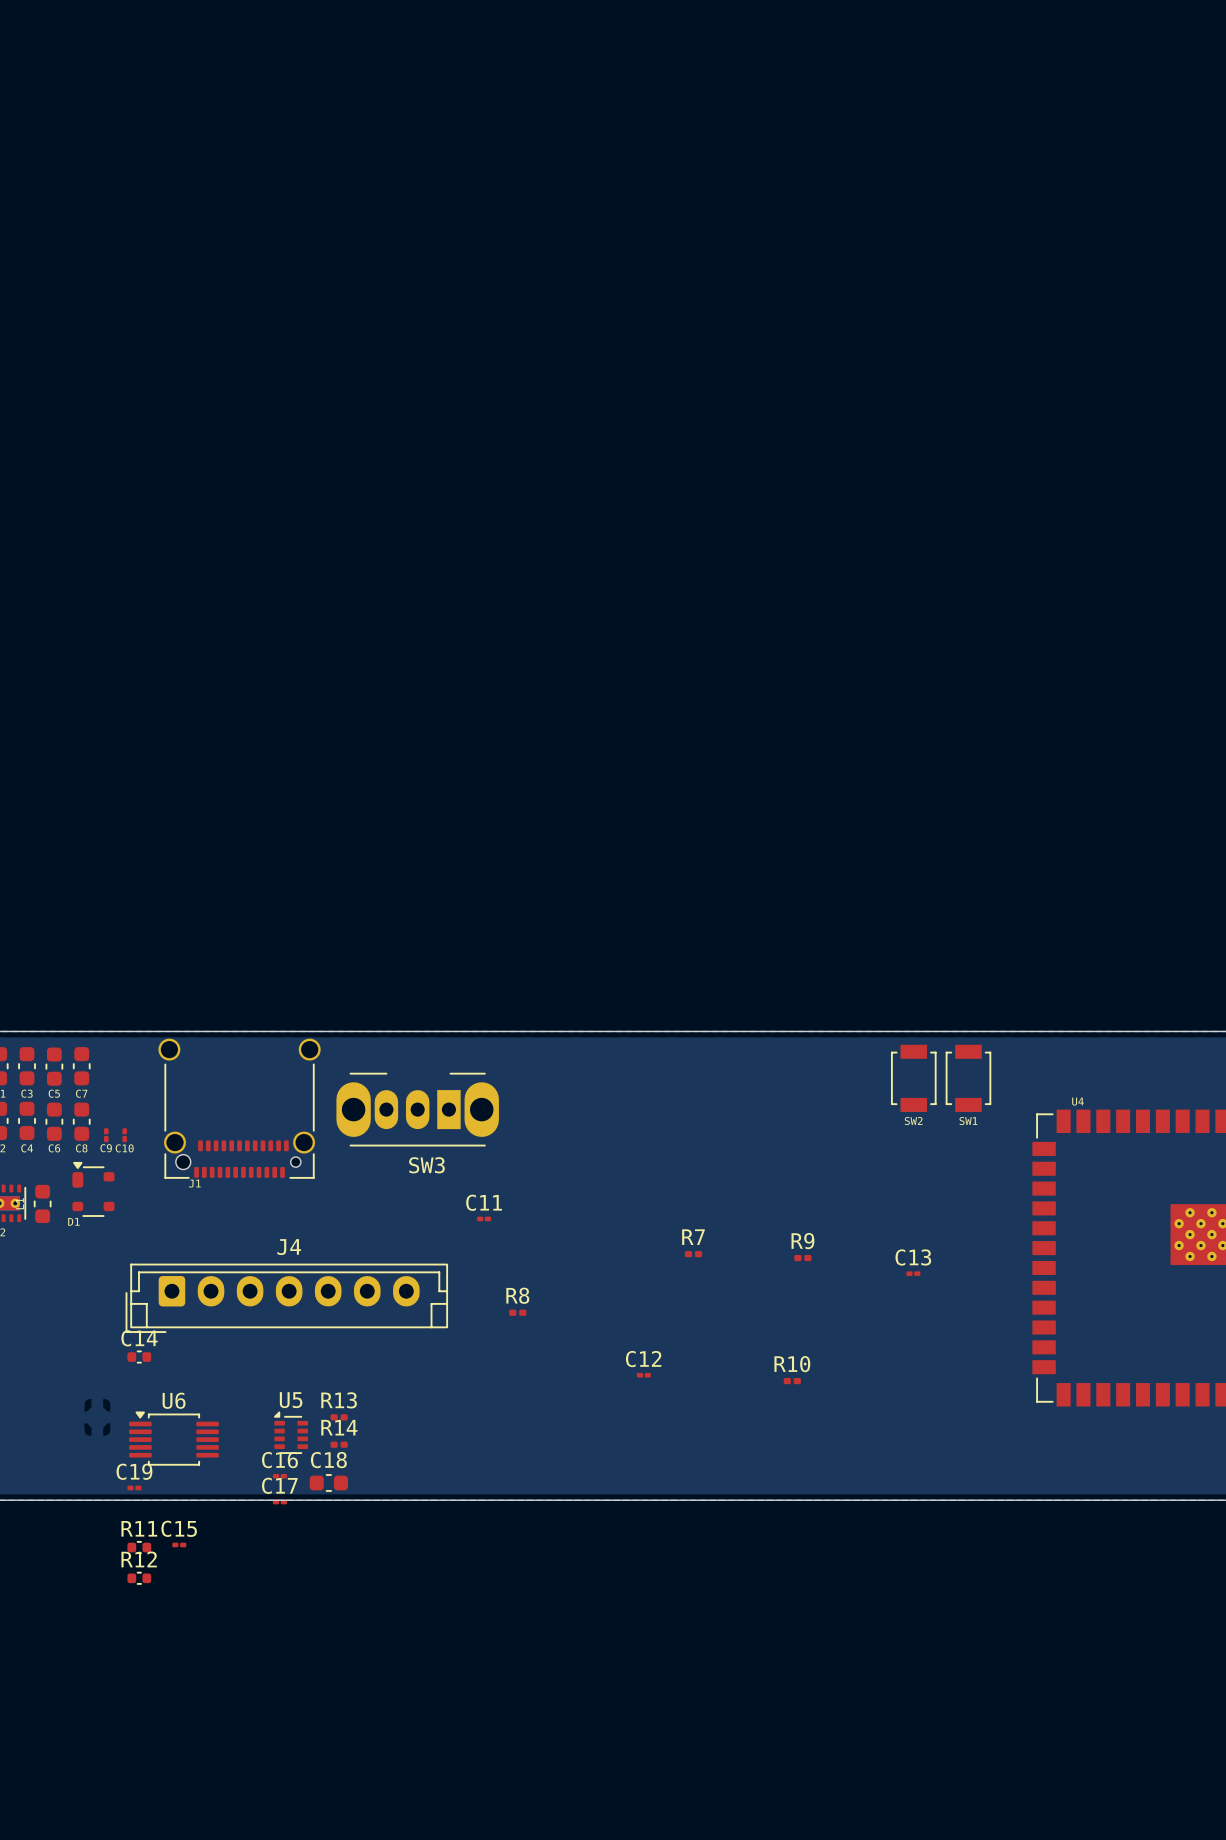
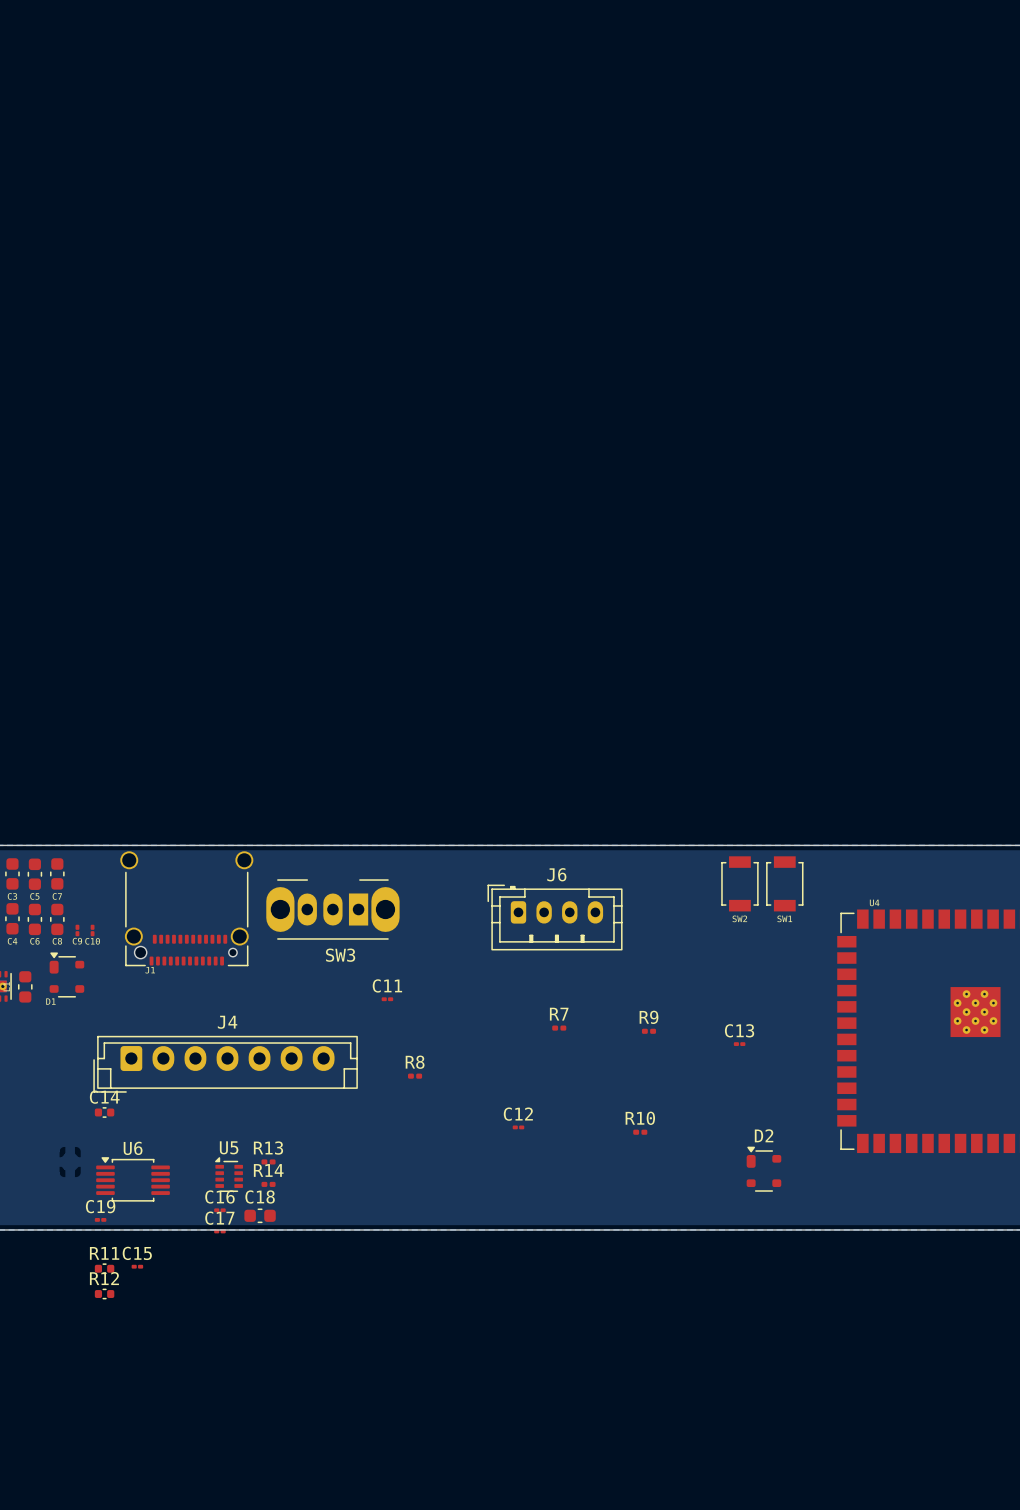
J6: none -> (555, 917)
D2: none -> (763, 1169)

